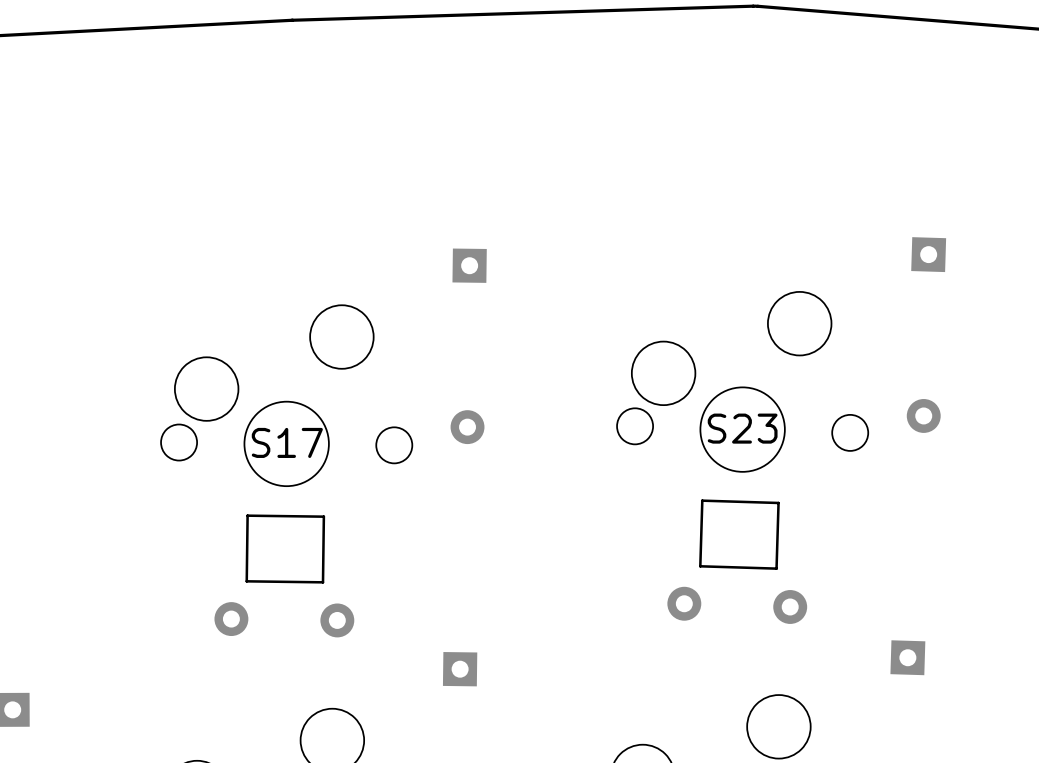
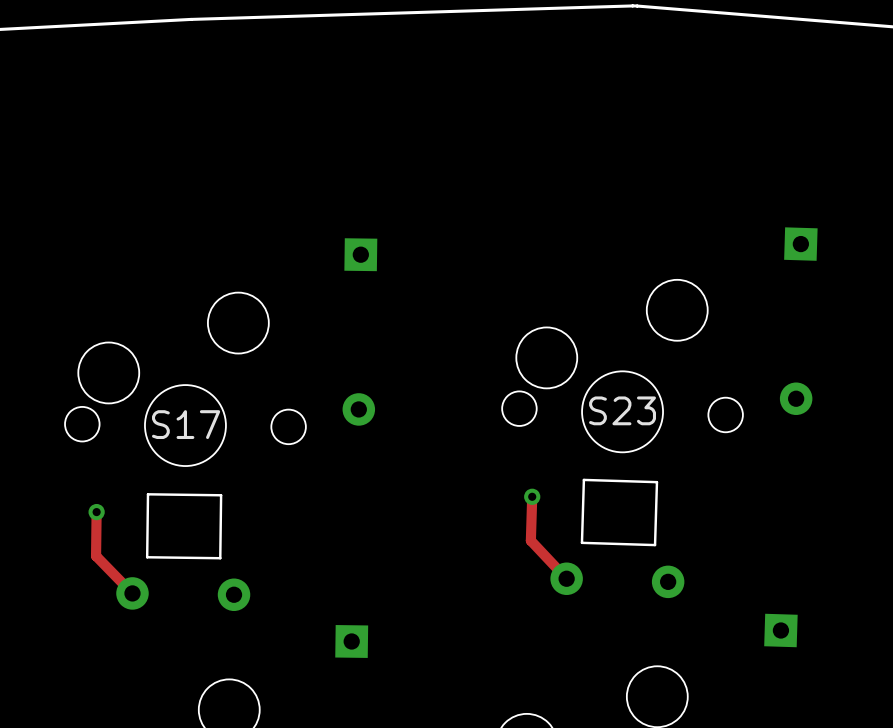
track: none -> (532, 496) (530, 540) (566, 578)
via: none -> (532, 496)
track: none -> (96, 512) (96, 556) (132, 593)
via: none -> (96, 512)

